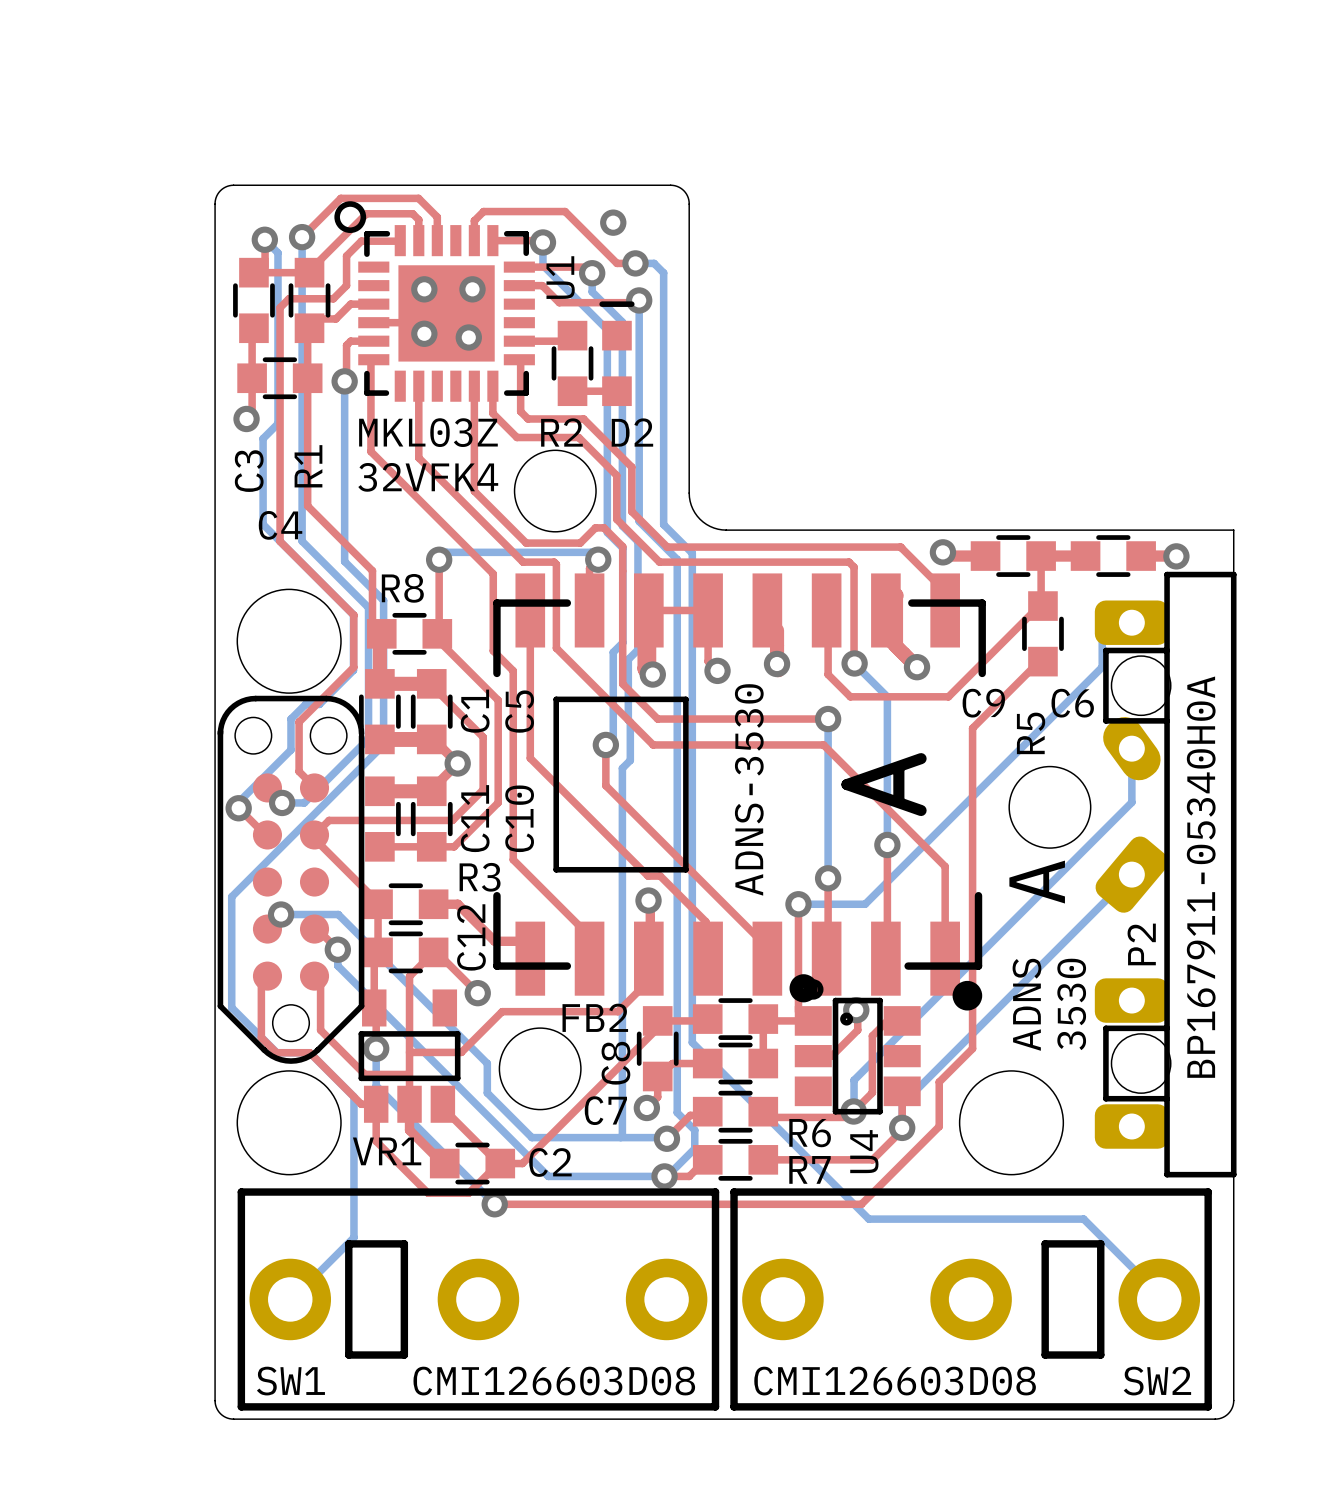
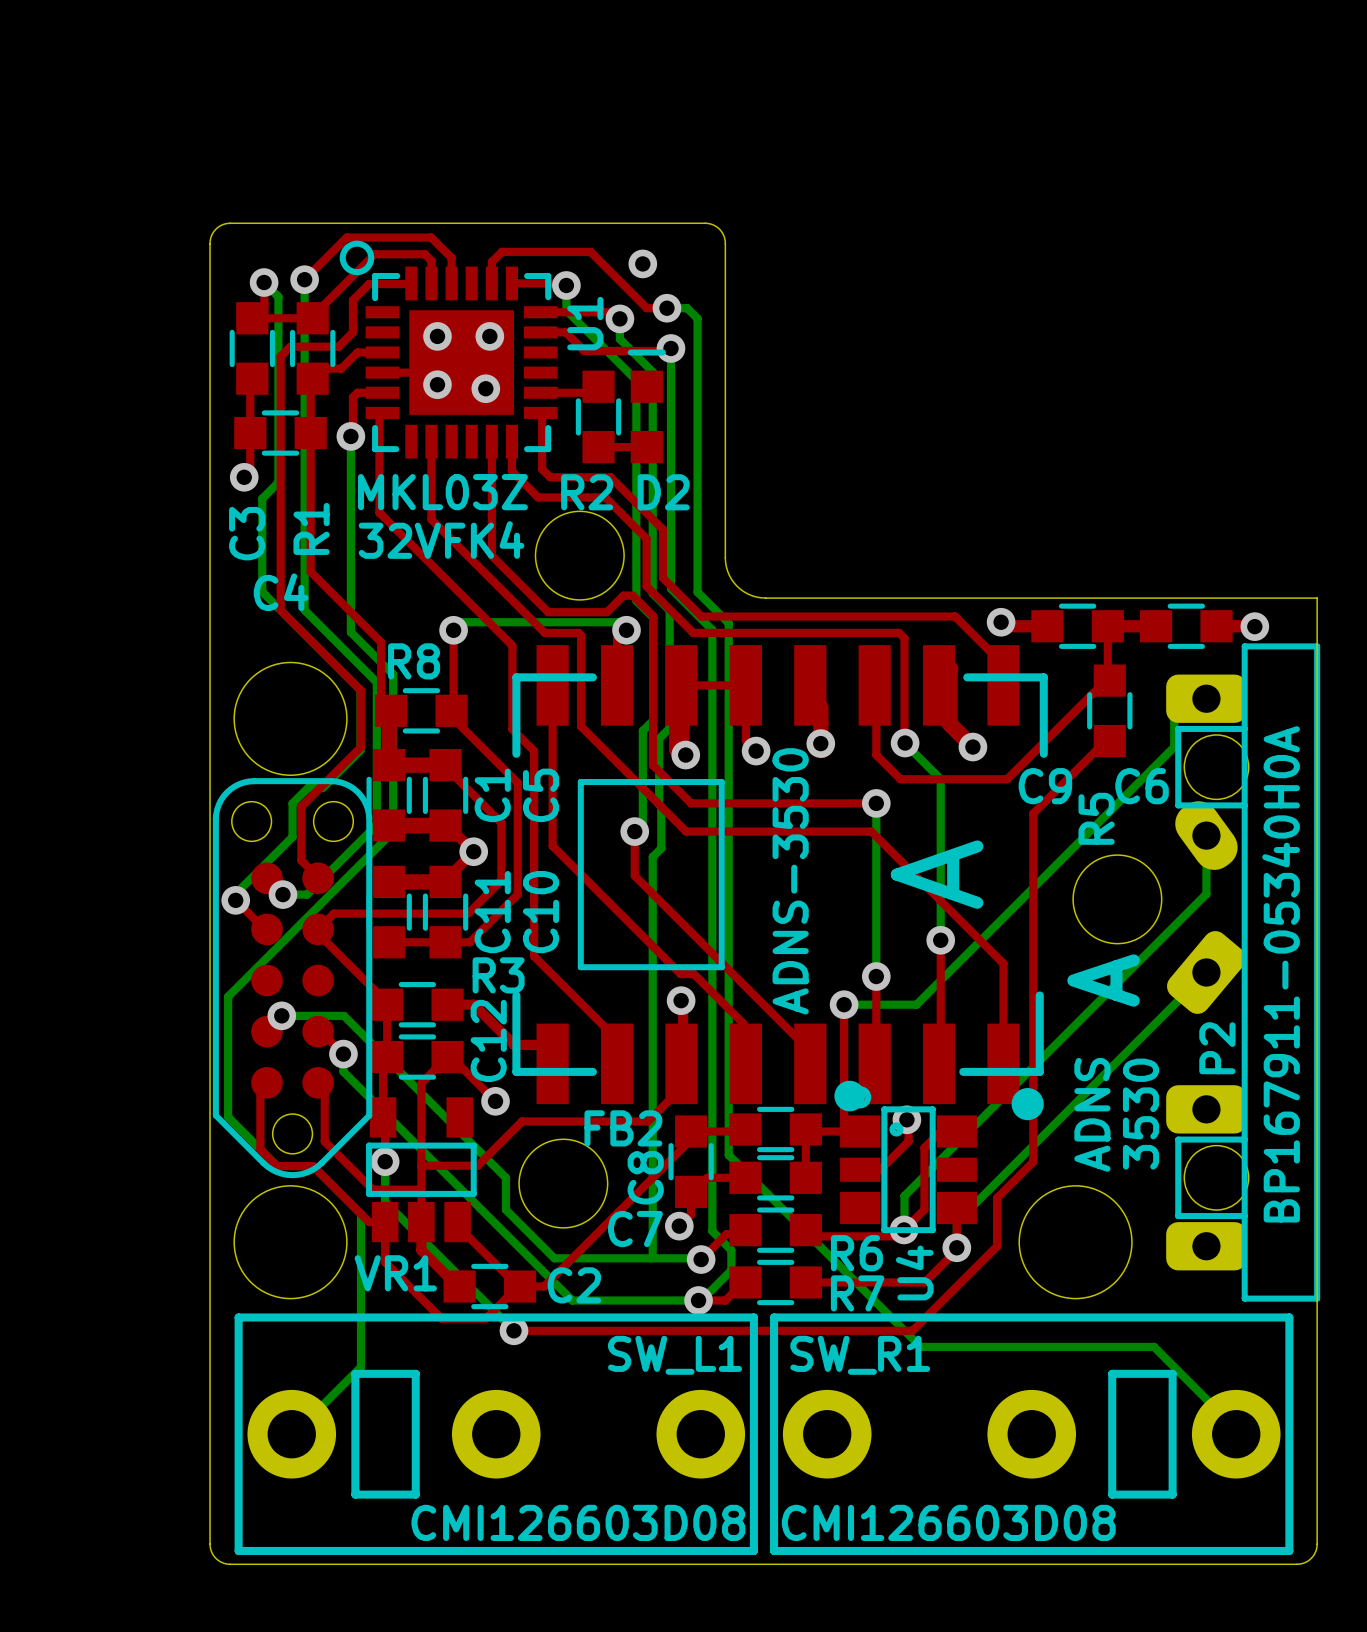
SW1 name: SW1 (290, 1381) -> SW_L1 (675, 1355)
SW2 name: SW2 (1157, 1381) -> SW_R1 (860, 1355)

